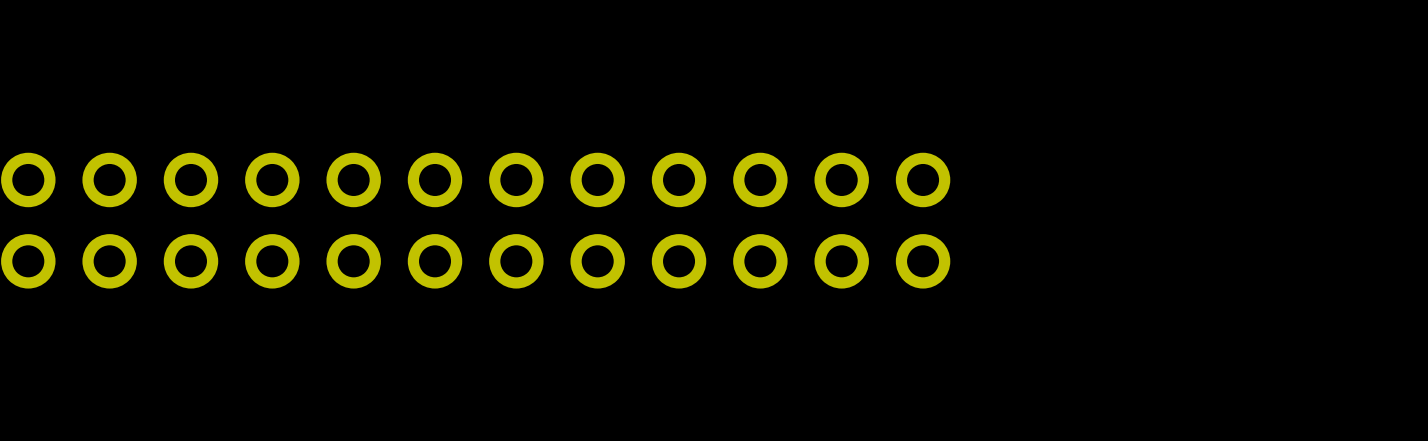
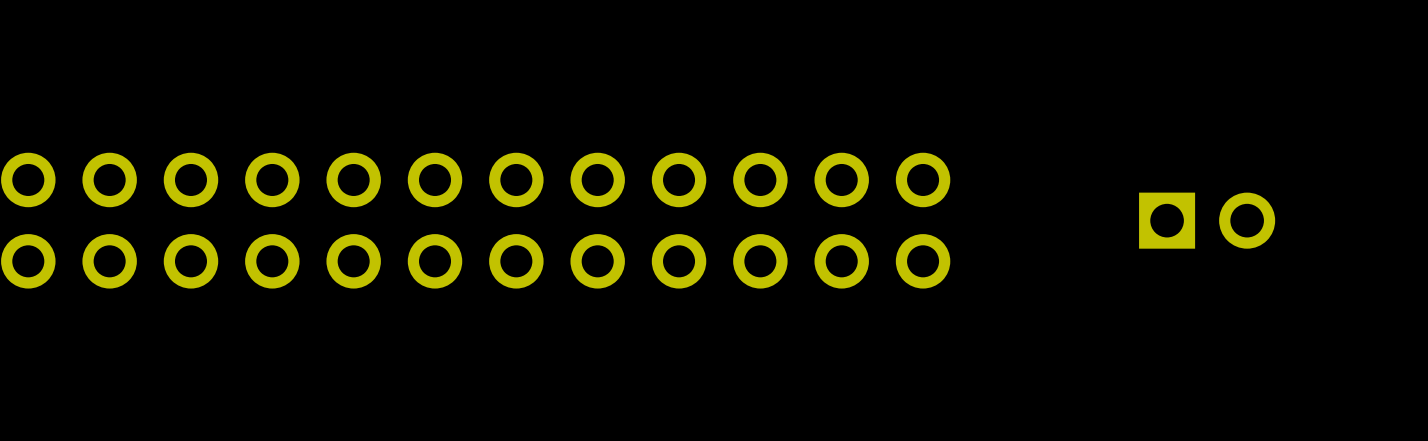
part: none -> (1207, 220)

